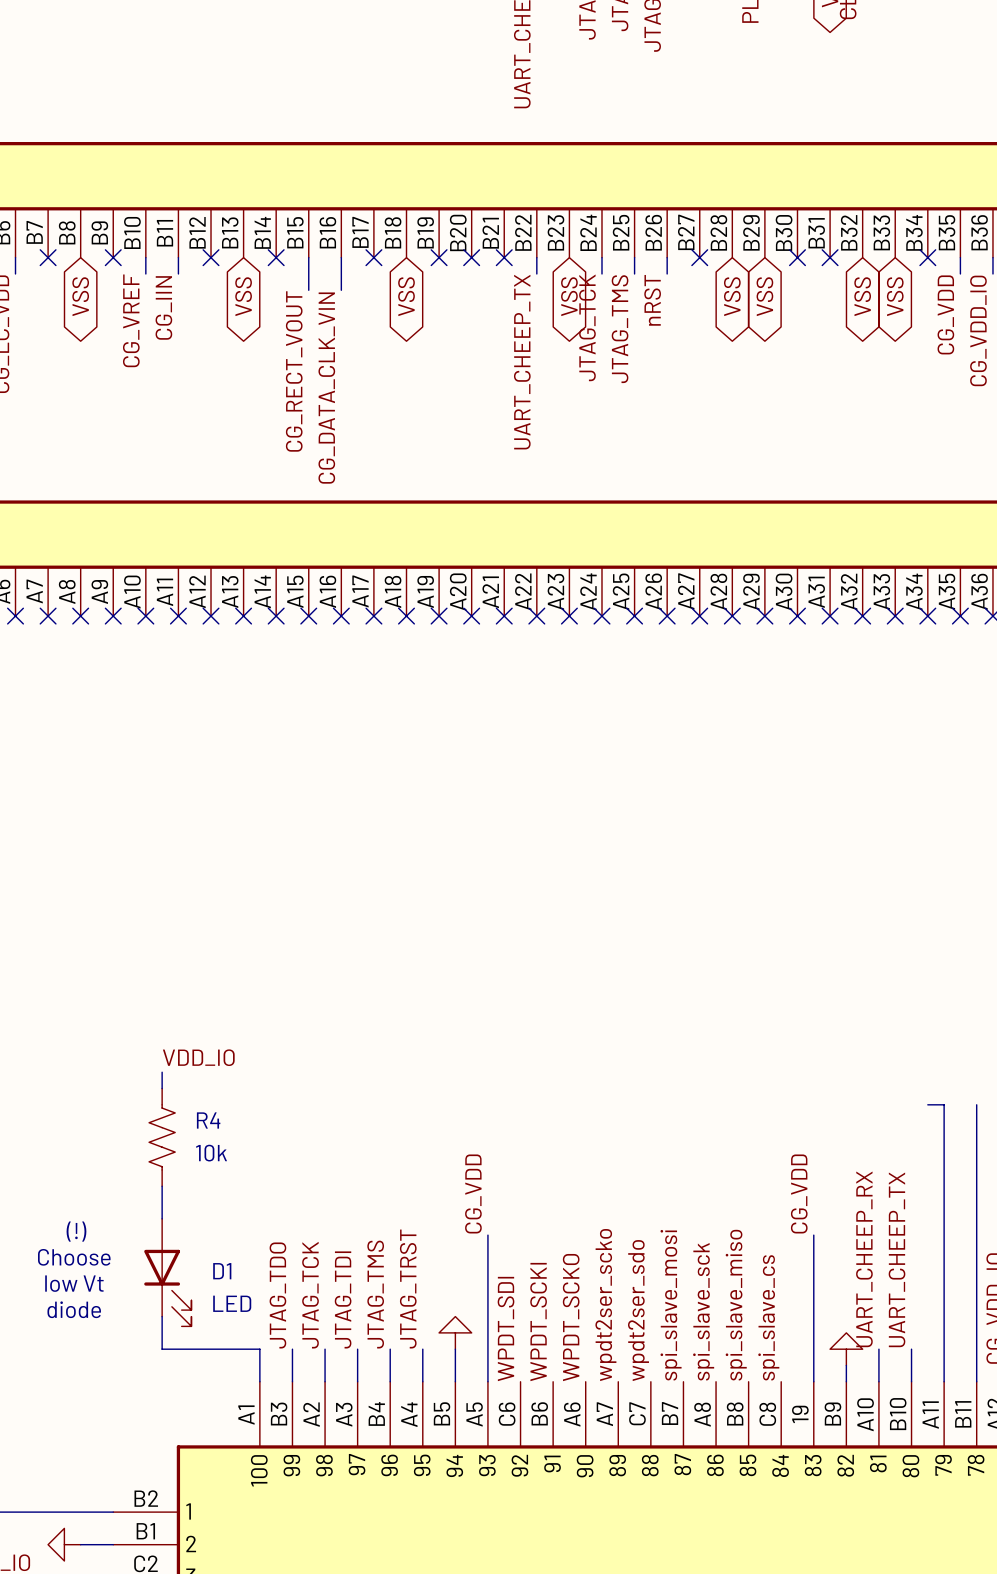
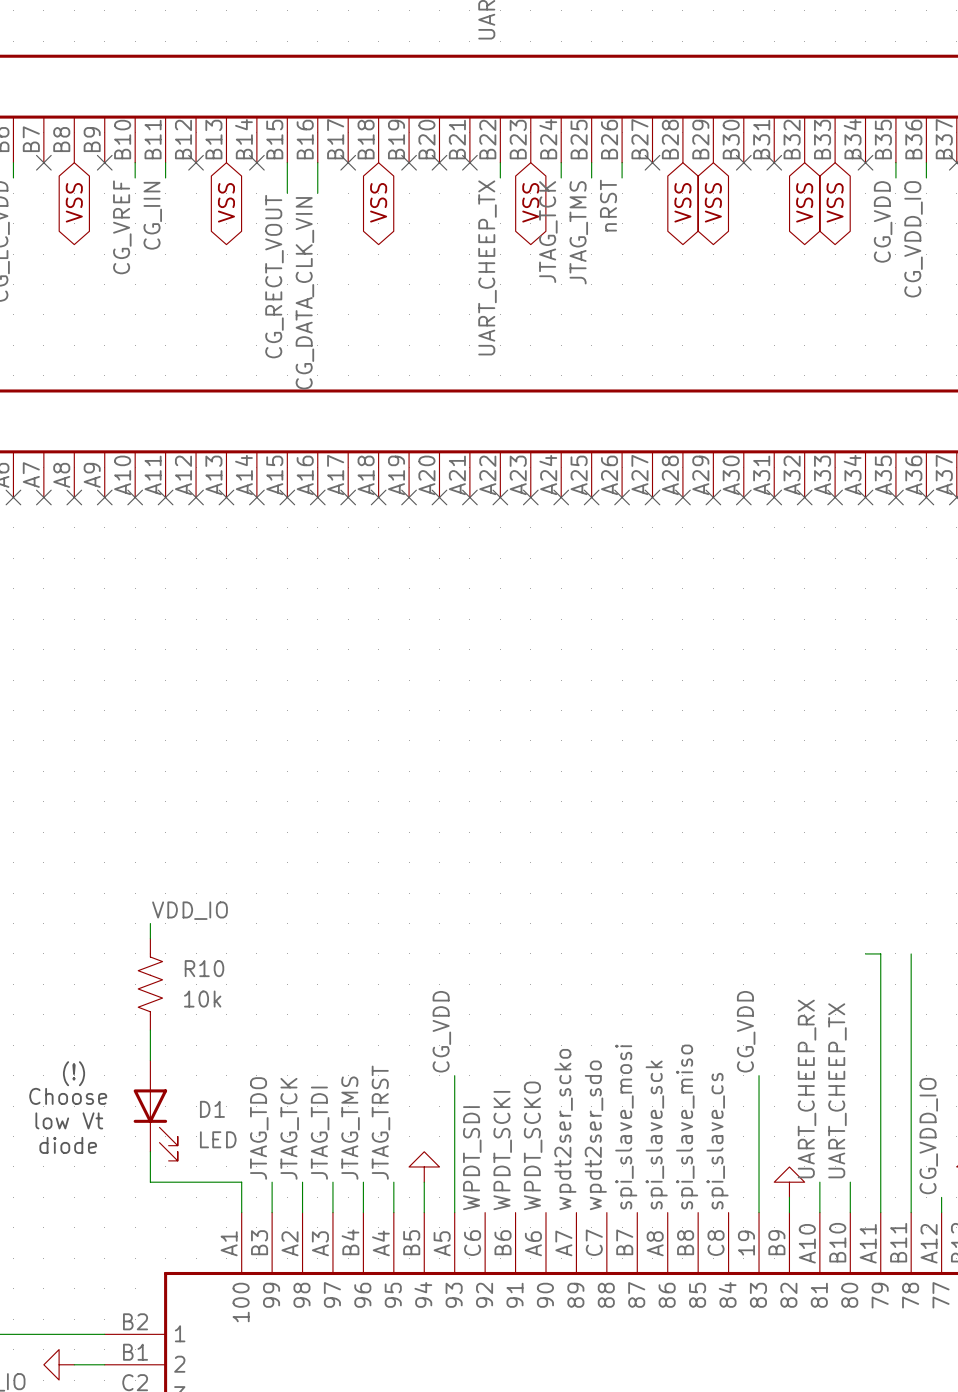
R4 name: R4 (208, 1120) -> R10 (204, 968)

